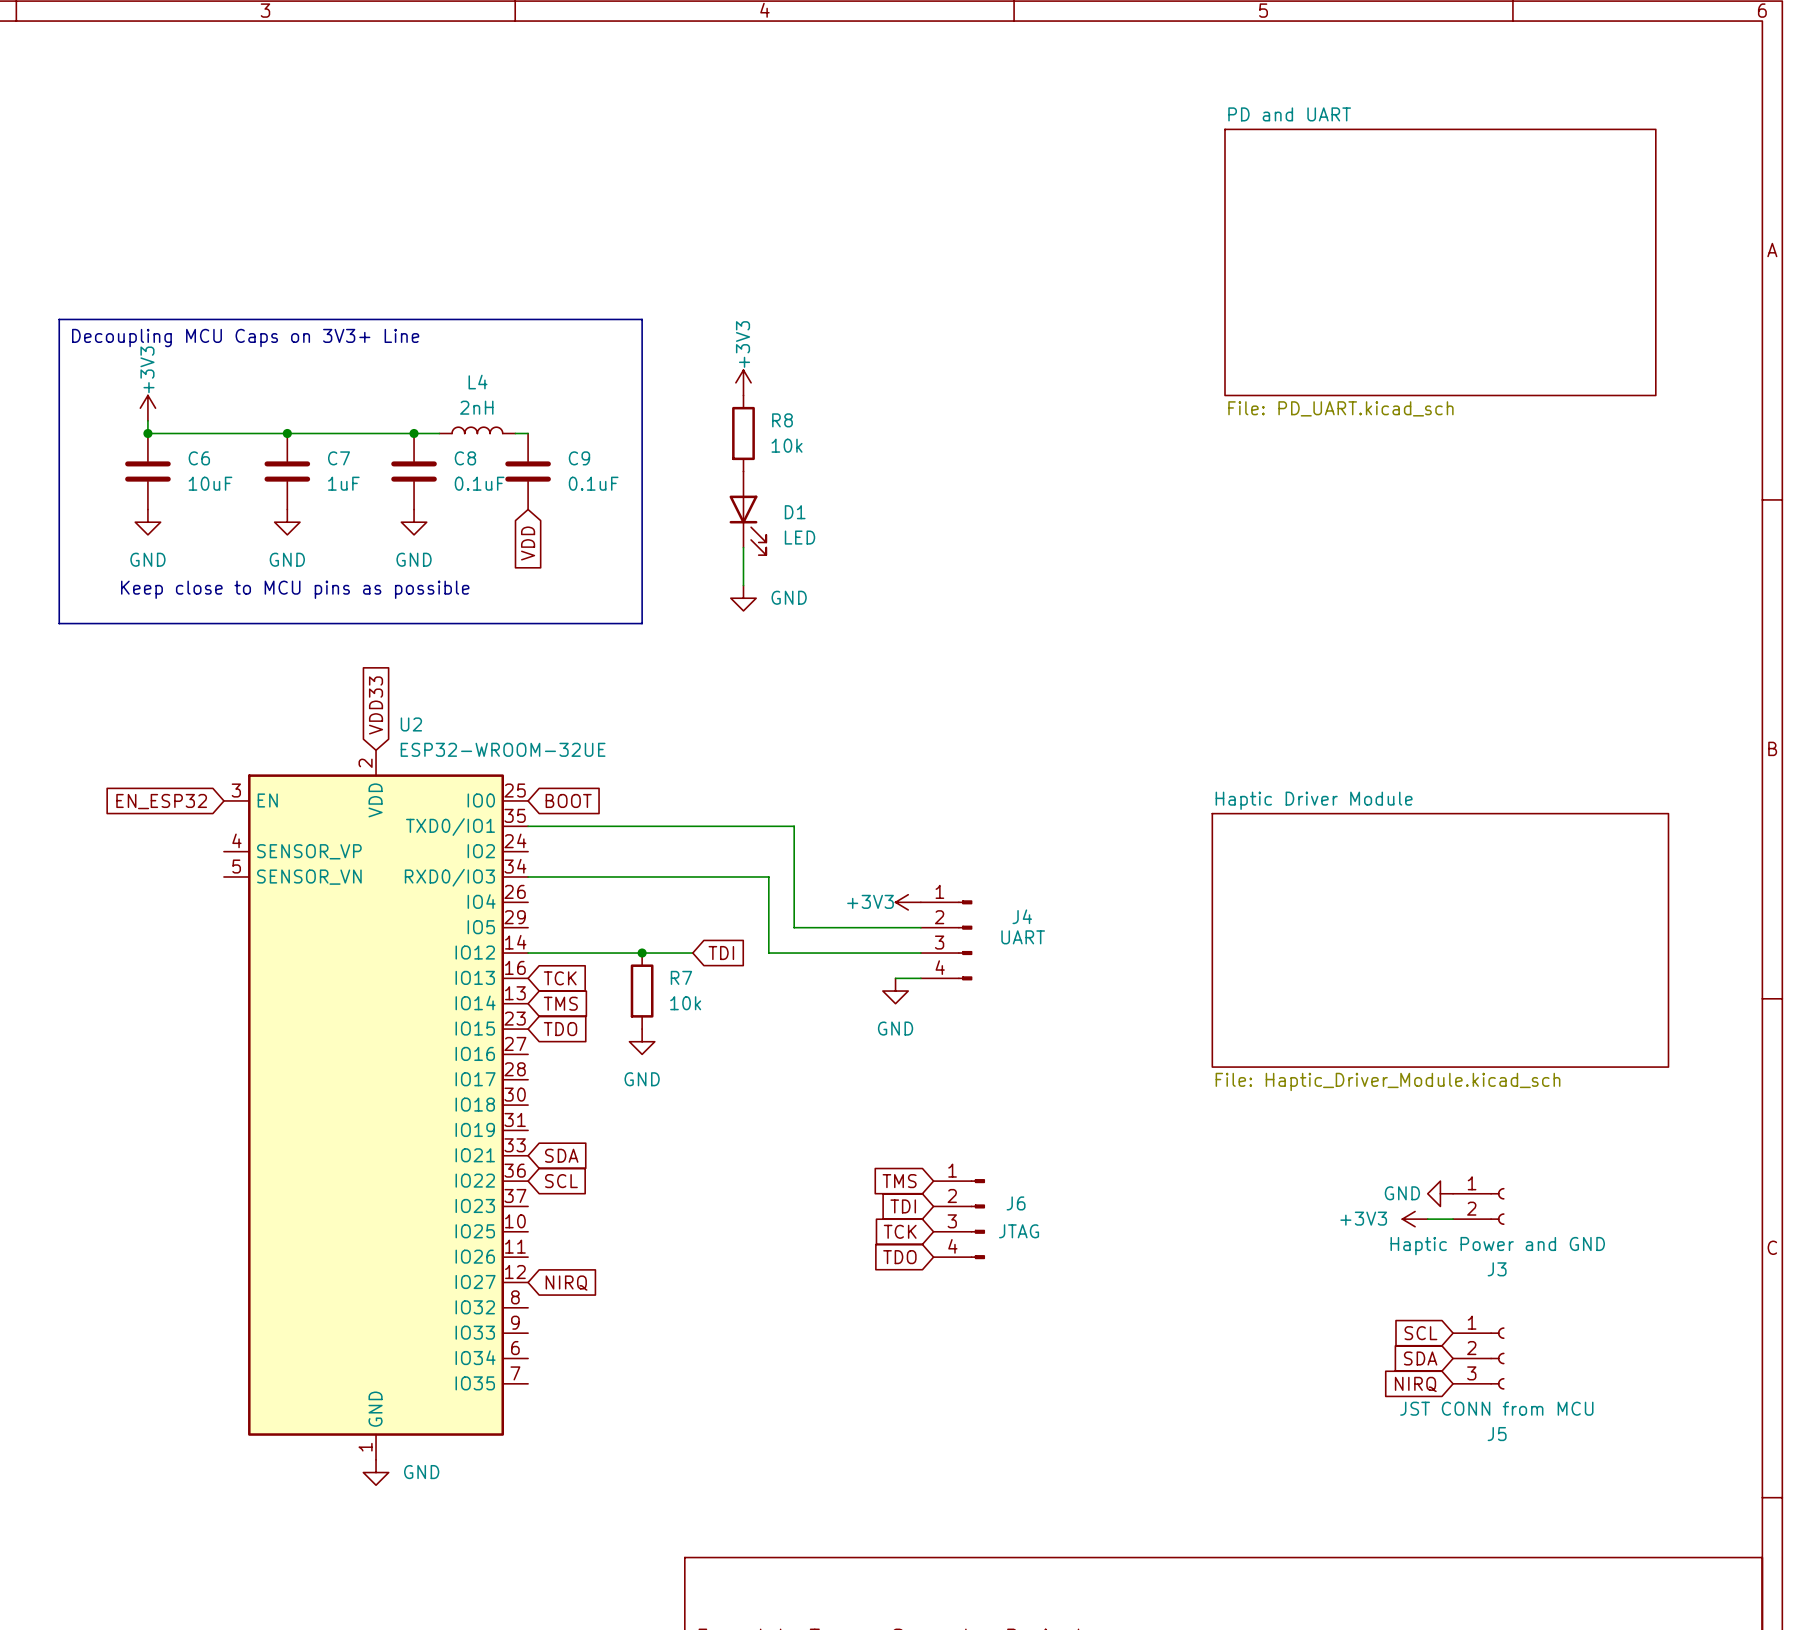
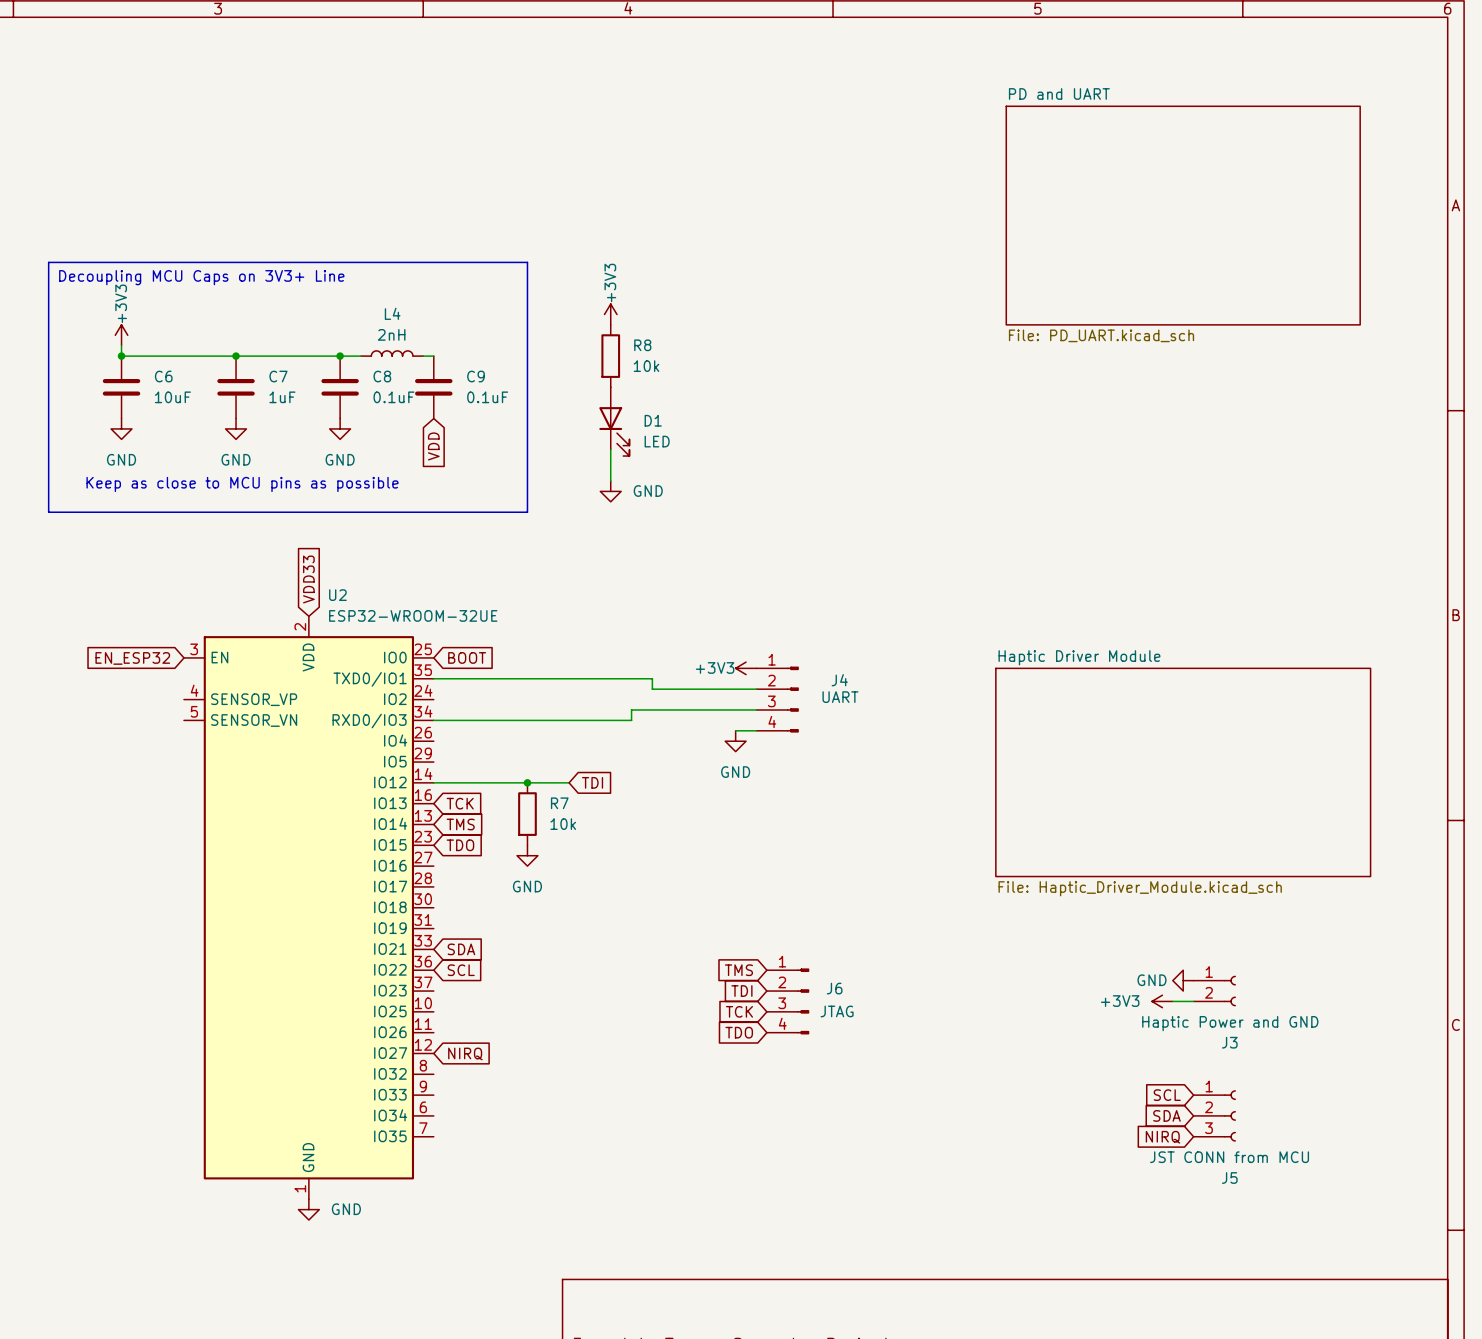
text: Keep close to MCU pins as possible (295, 589) -> Keep as close to MCU pins as possible (242, 484)
wire: (794, 838) (794, 927) (920, 927) -> (652, 689) (756, 689)
wire: (768, 876) (768, 953) (920, 953) -> (631, 720) (631, 709) (756, 709)
power symbol position: +3V3 (908, 902) -> +3V3 (746, 668)
J4 position: (946, 940) -> (777, 699)
wire: (895, 978) (920, 978) -> (735, 730) (756, 730)
power symbol position: GND (895, 991) -> GND (735, 741)

